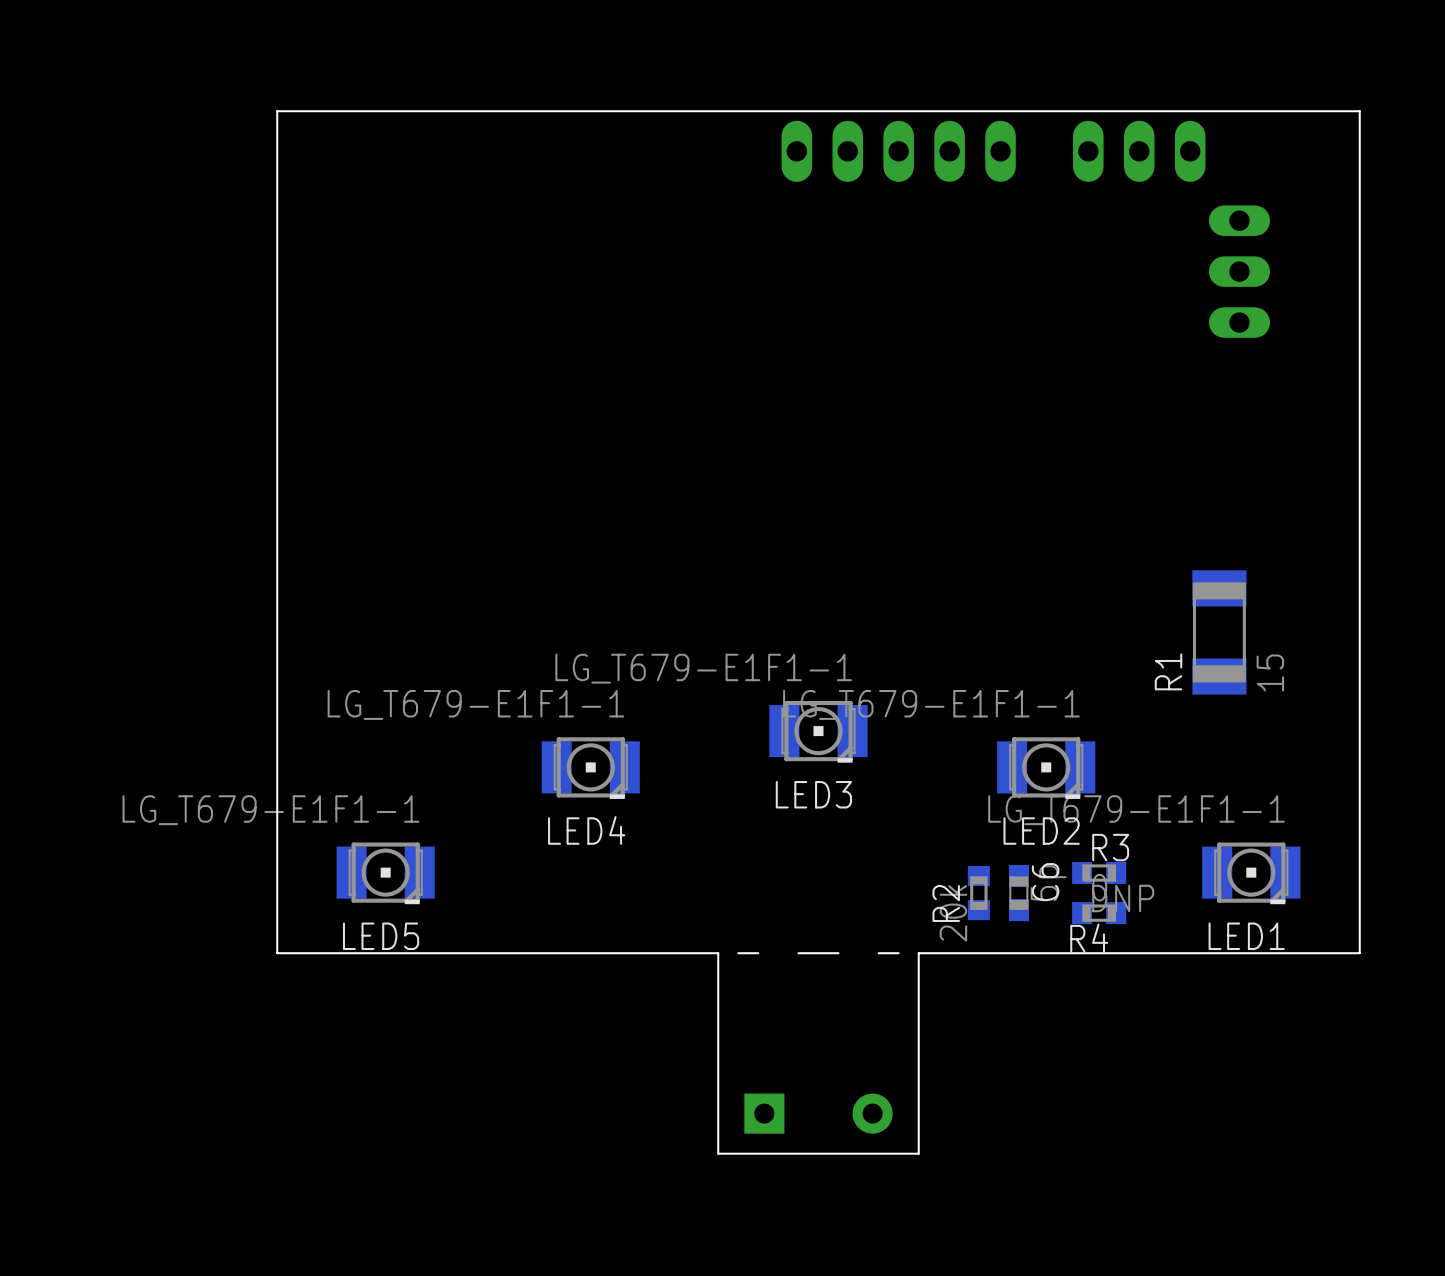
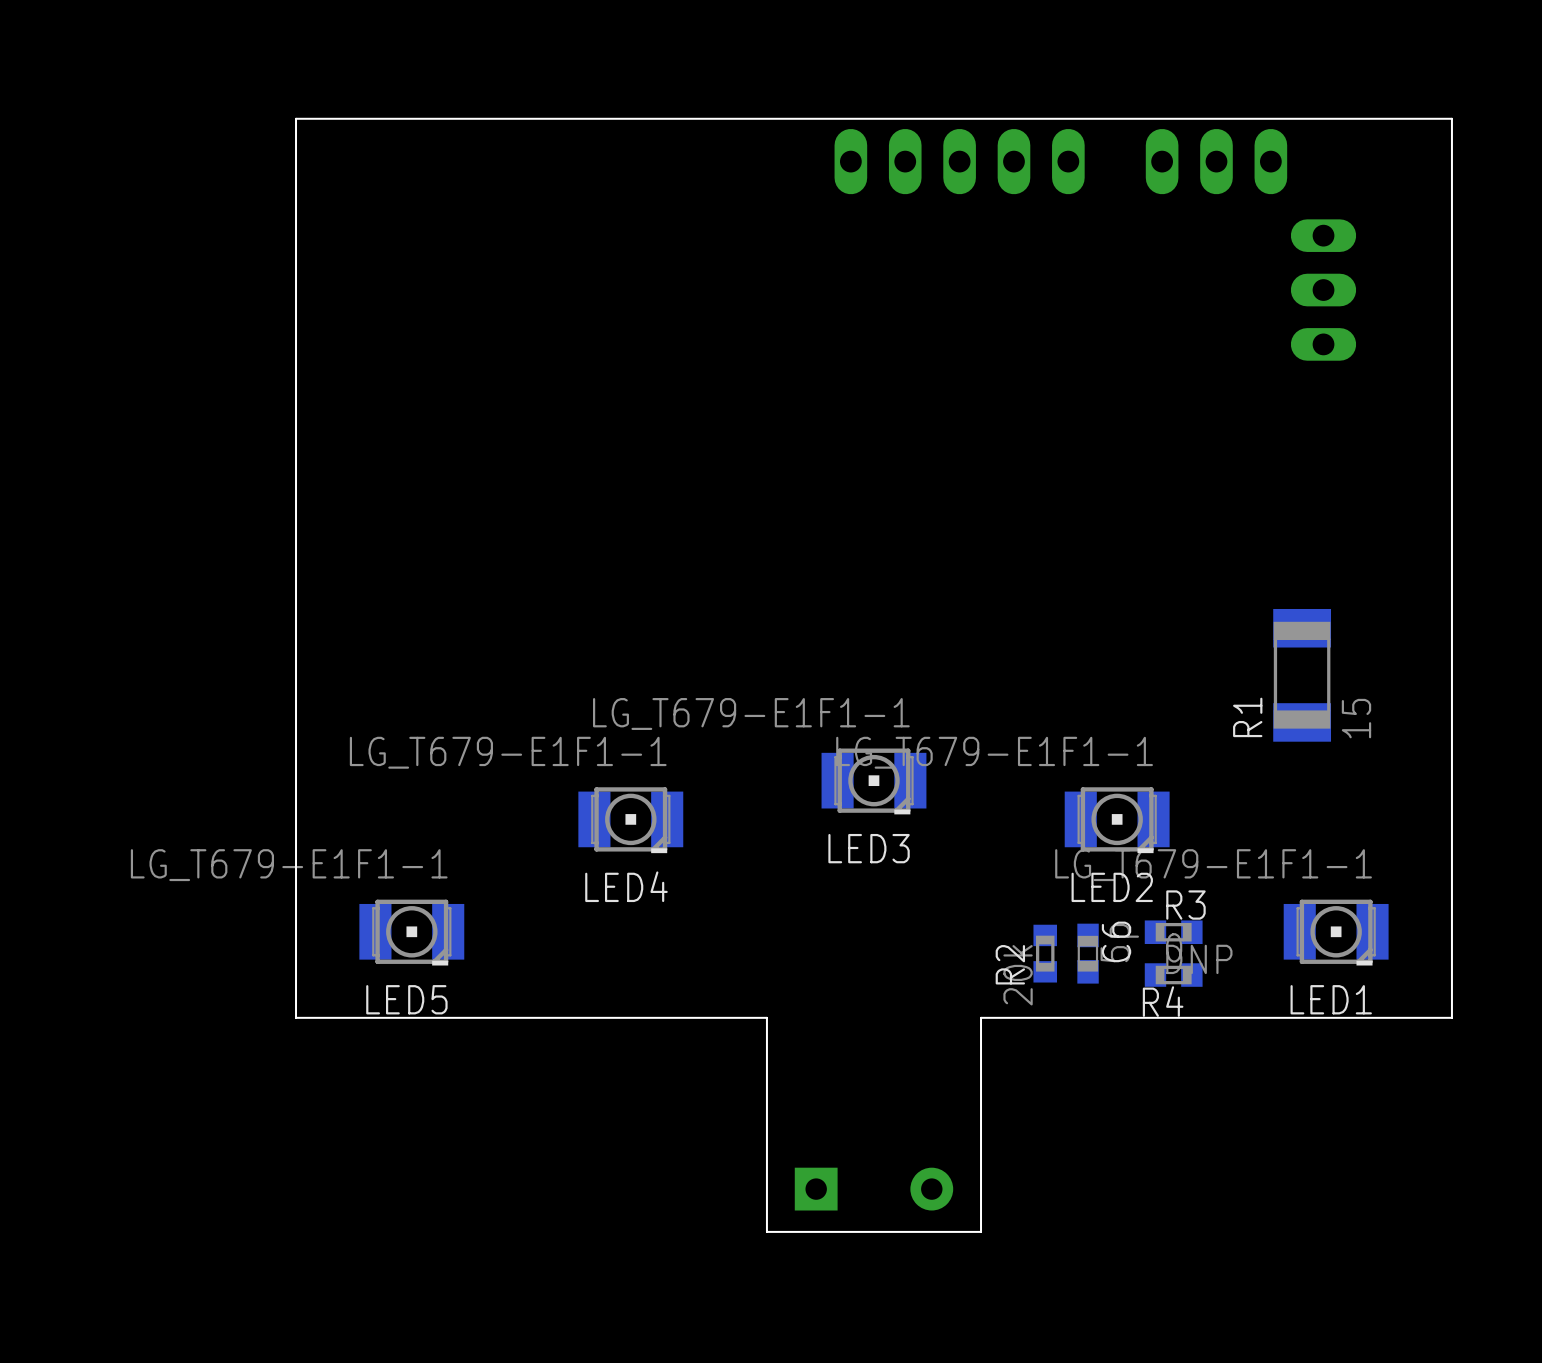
board edge: (758, 953) (738, 953) -> none
board edge: (838, 953) (798, 953) -> none
board edge: (898, 953) (878, 953) -> none

